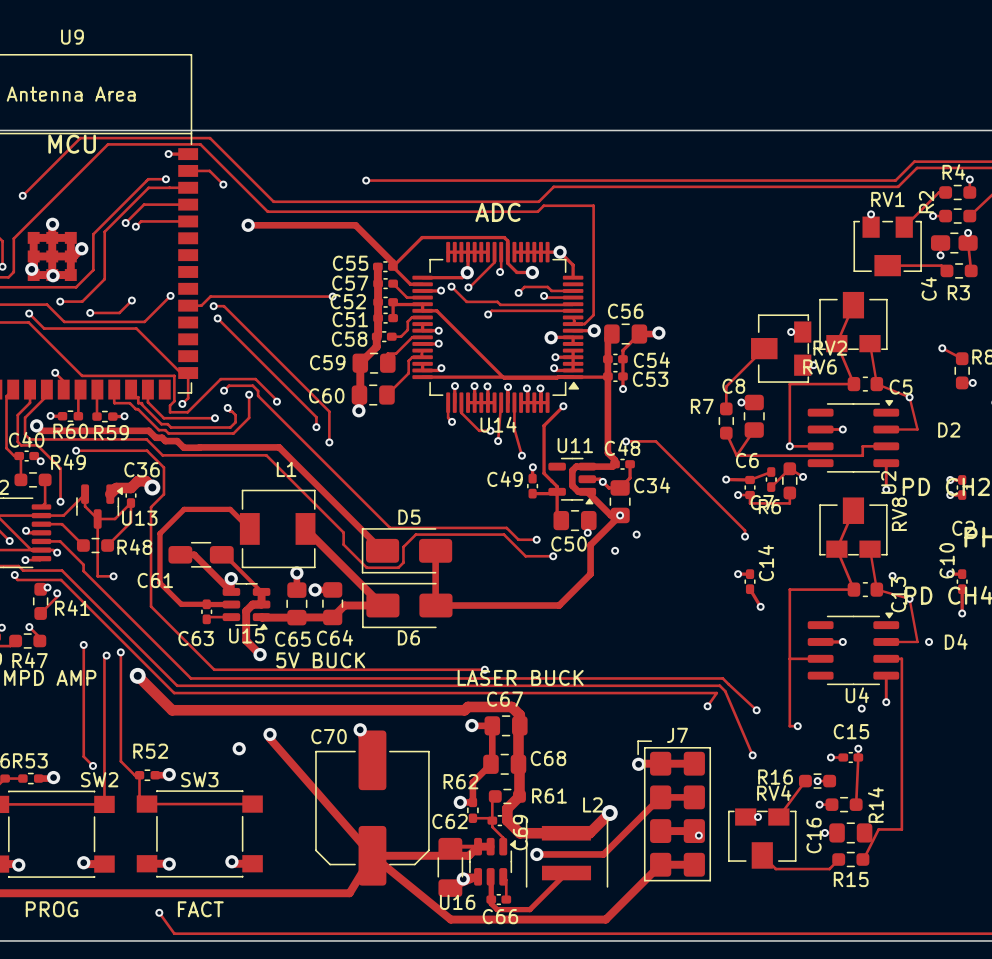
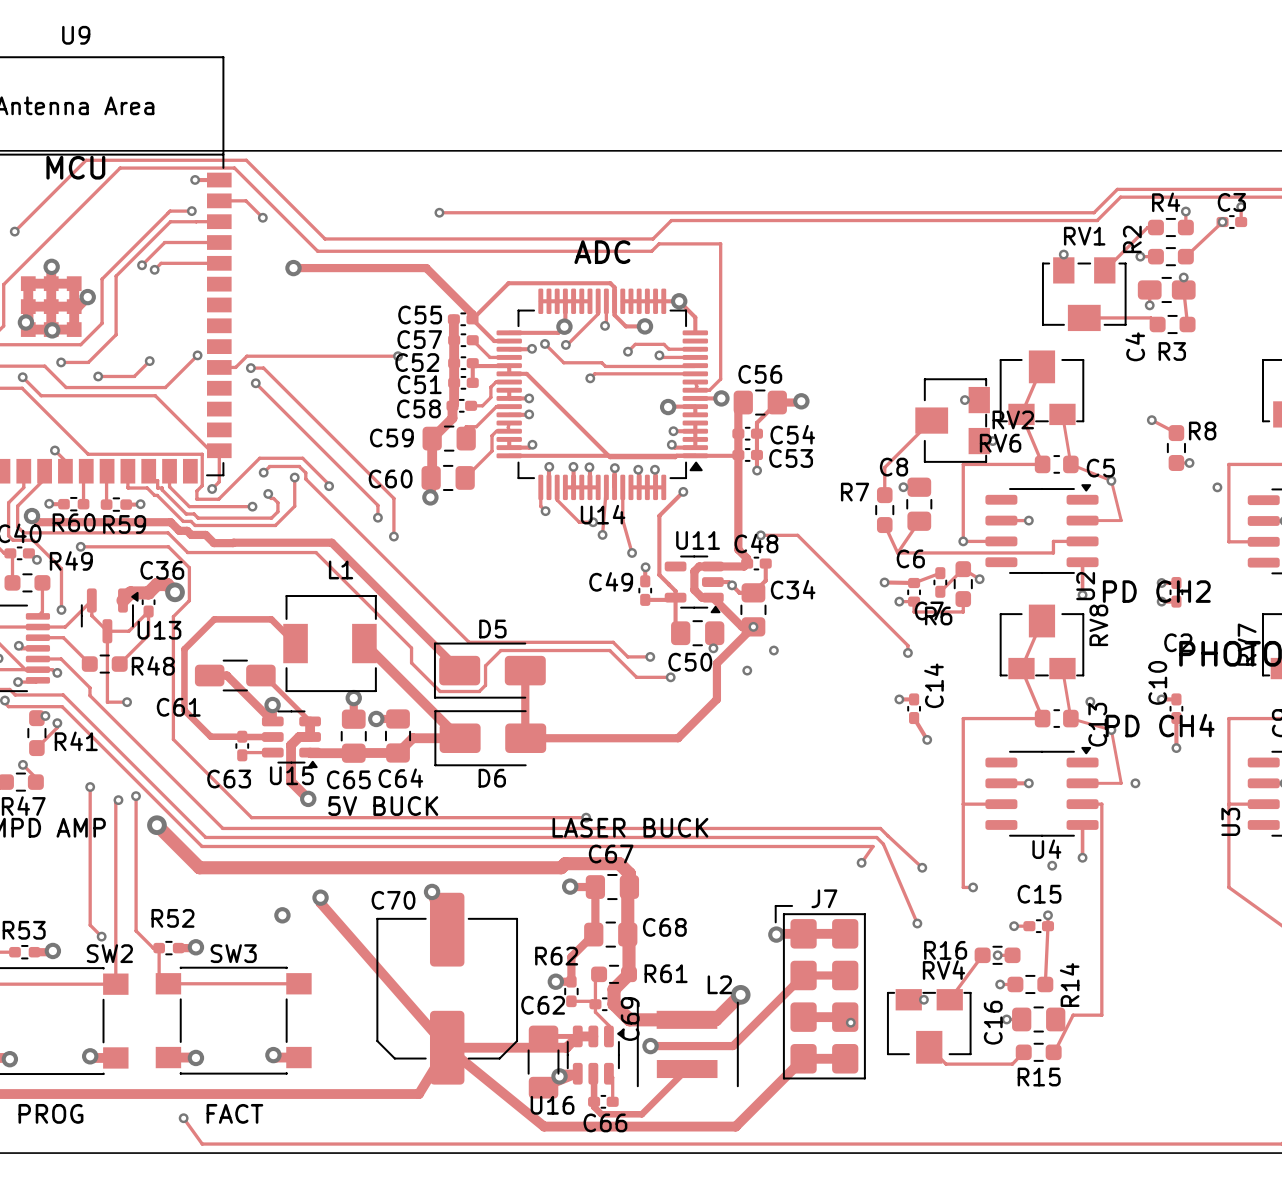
D2: (949, 429) -> none
D4: (956, 641) -> none

